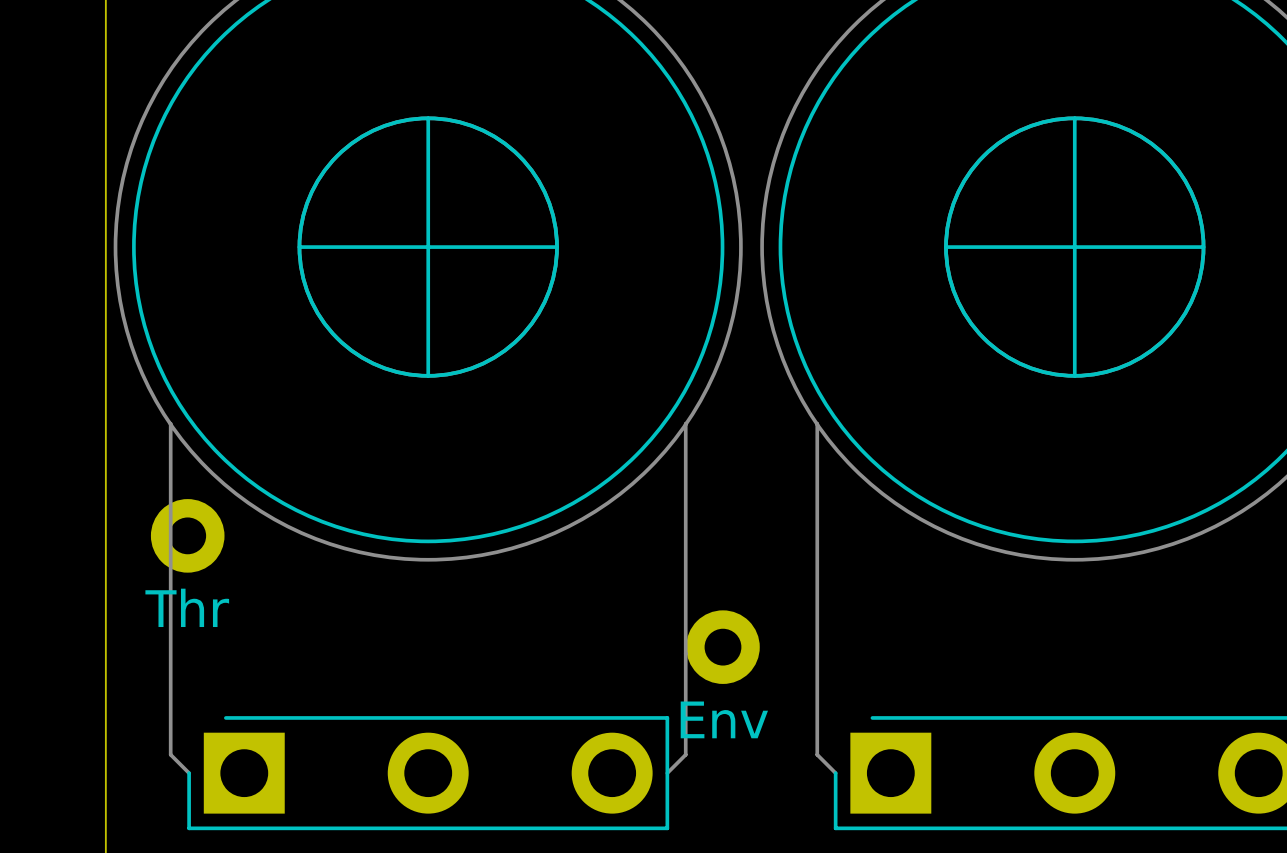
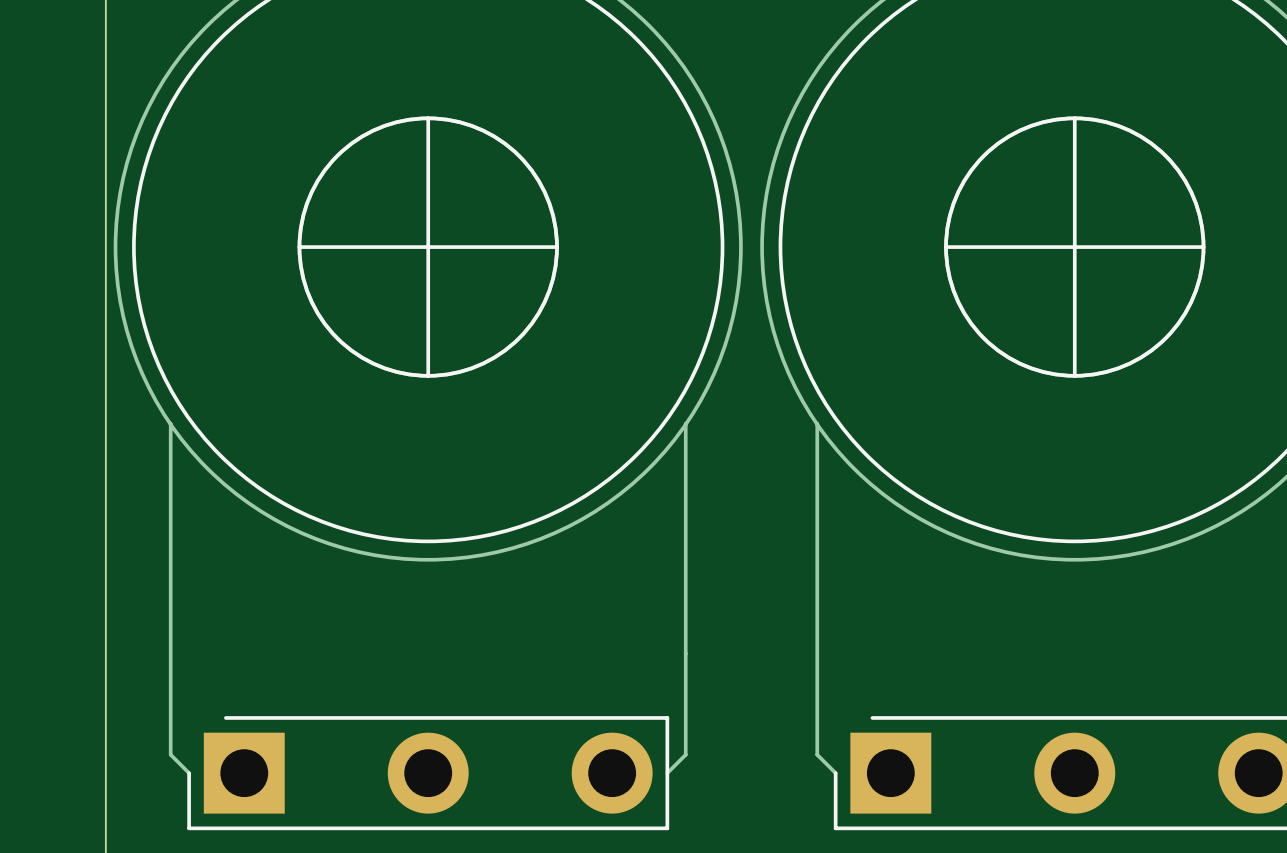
part: Thr (187, 535) -> none
part: Env (722, 647) -> none

